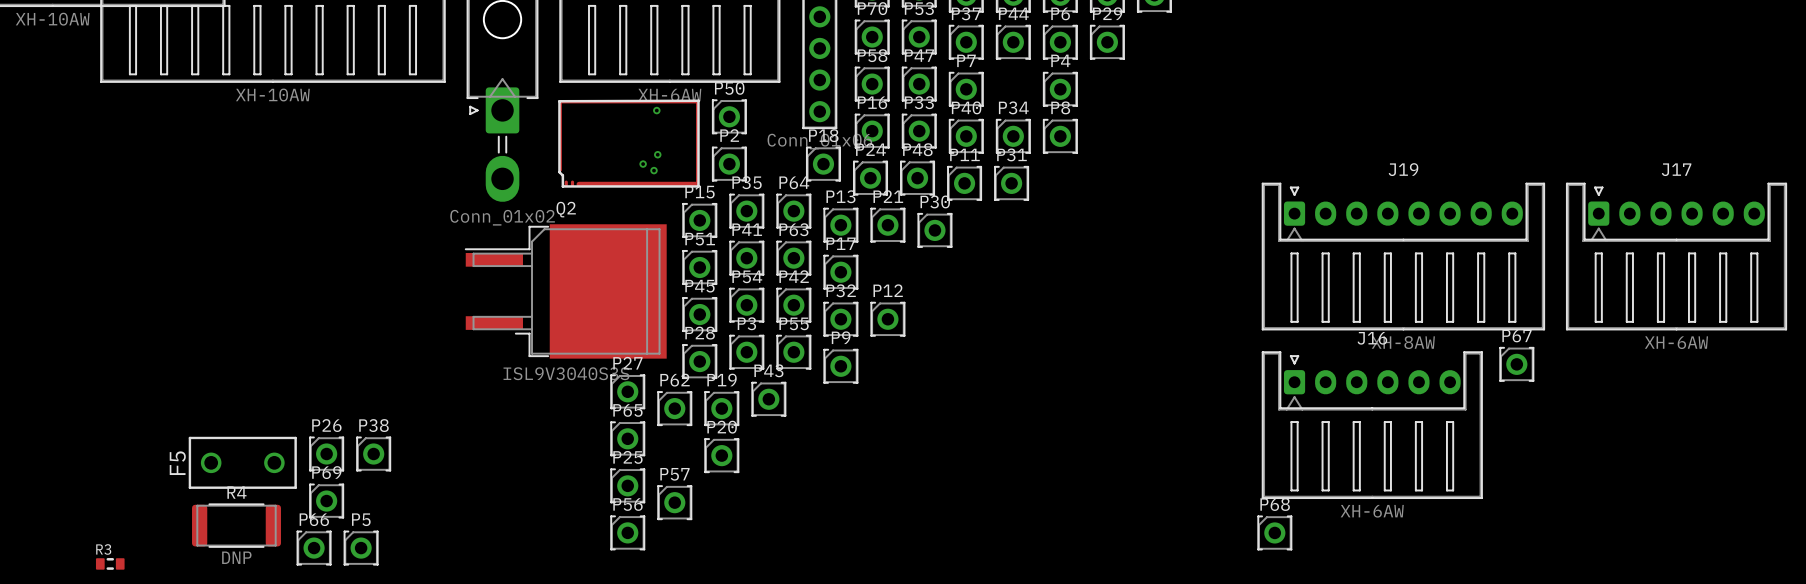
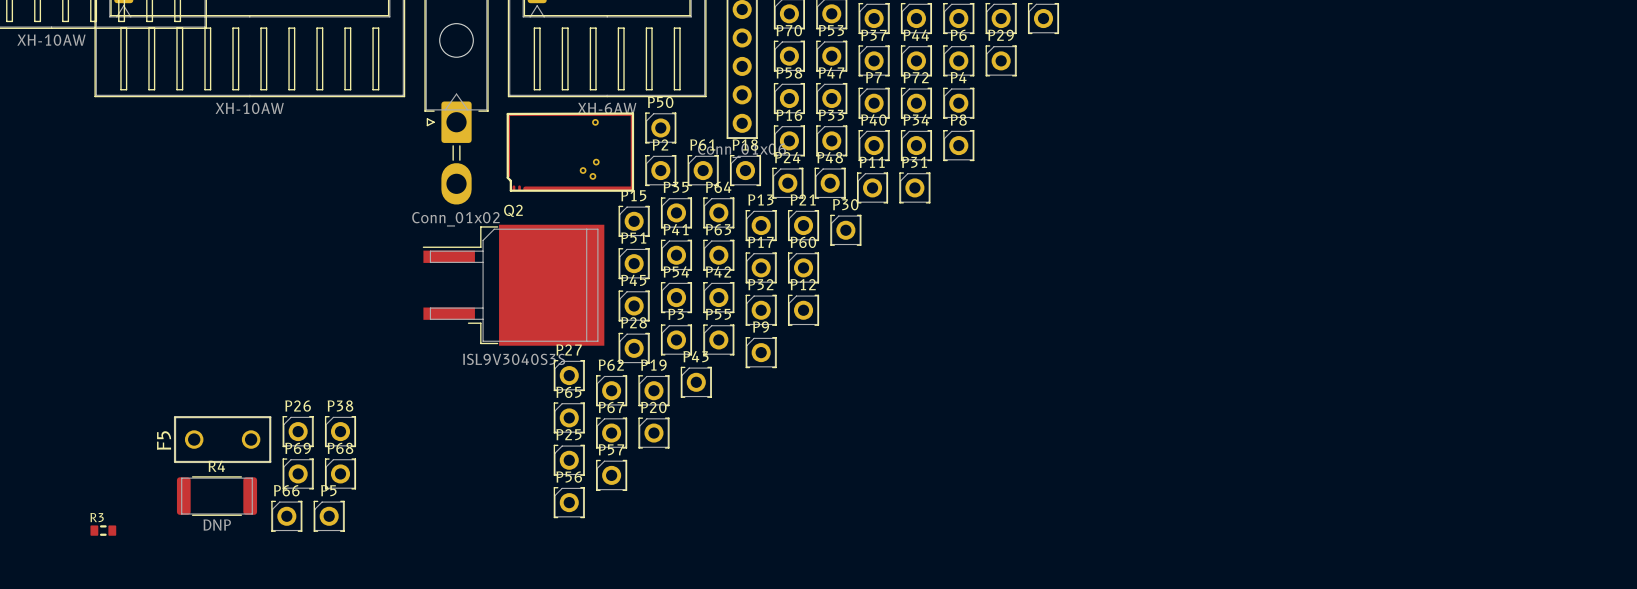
P72: none -> (916, 103)
P61: none -> (703, 170)
J19: XH-8AW (1403, 256) -> none
J17: XH-6AW (1676, 256) -> none
P60: none -> (803, 267)
P67 position: (1516, 364) -> (611, 433)
J16: XH-6AW (1372, 425) -> none
P68 position: (1274, 532) -> (340, 473)

